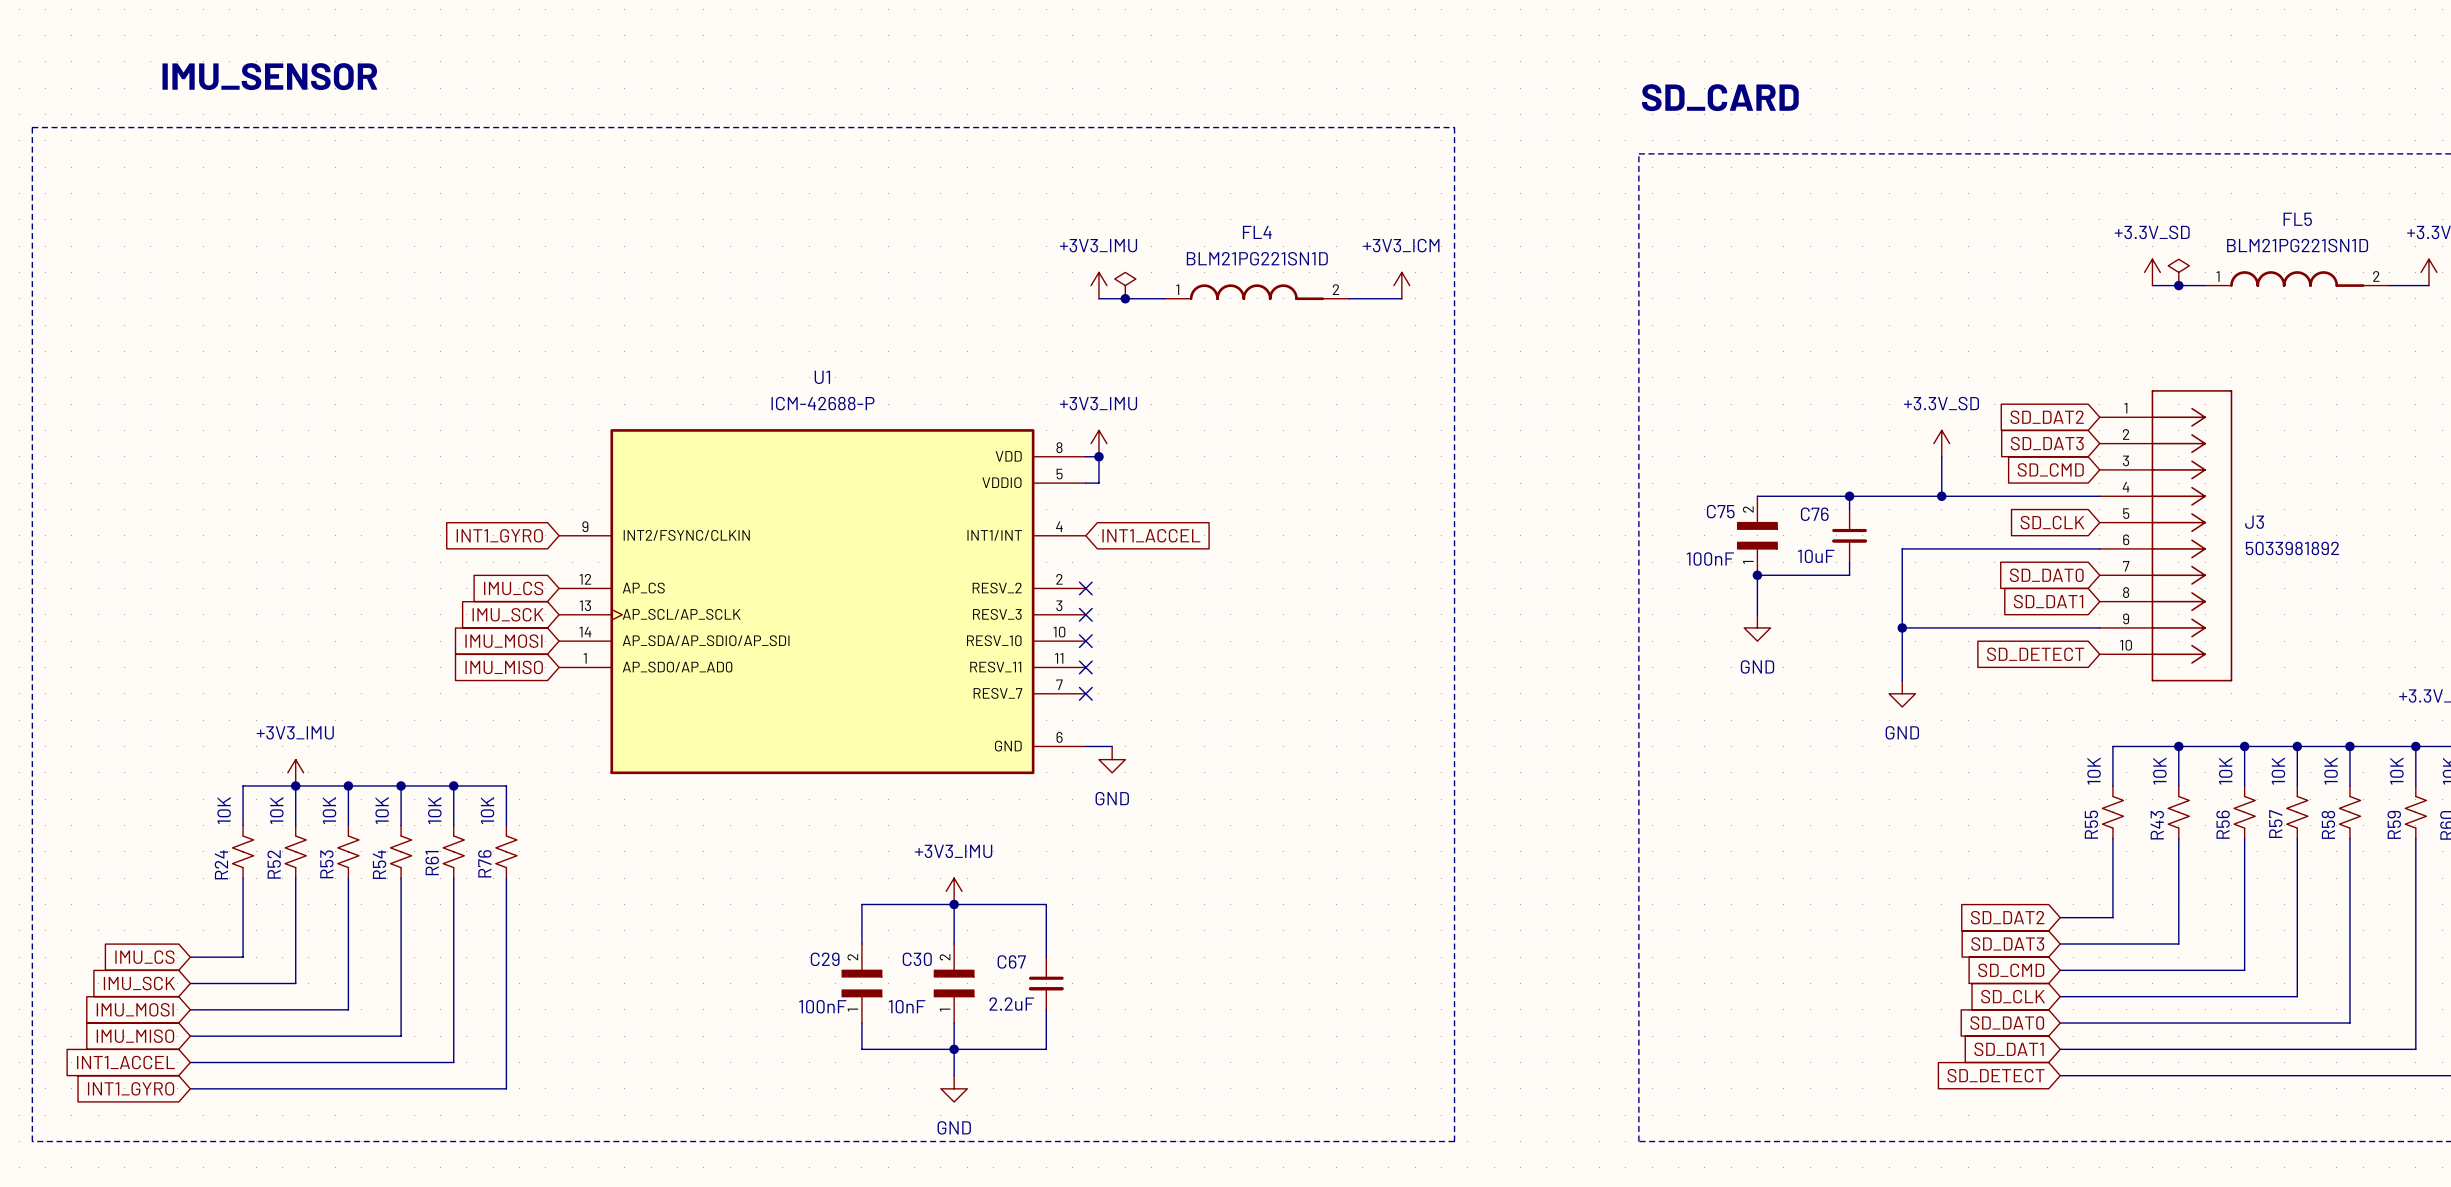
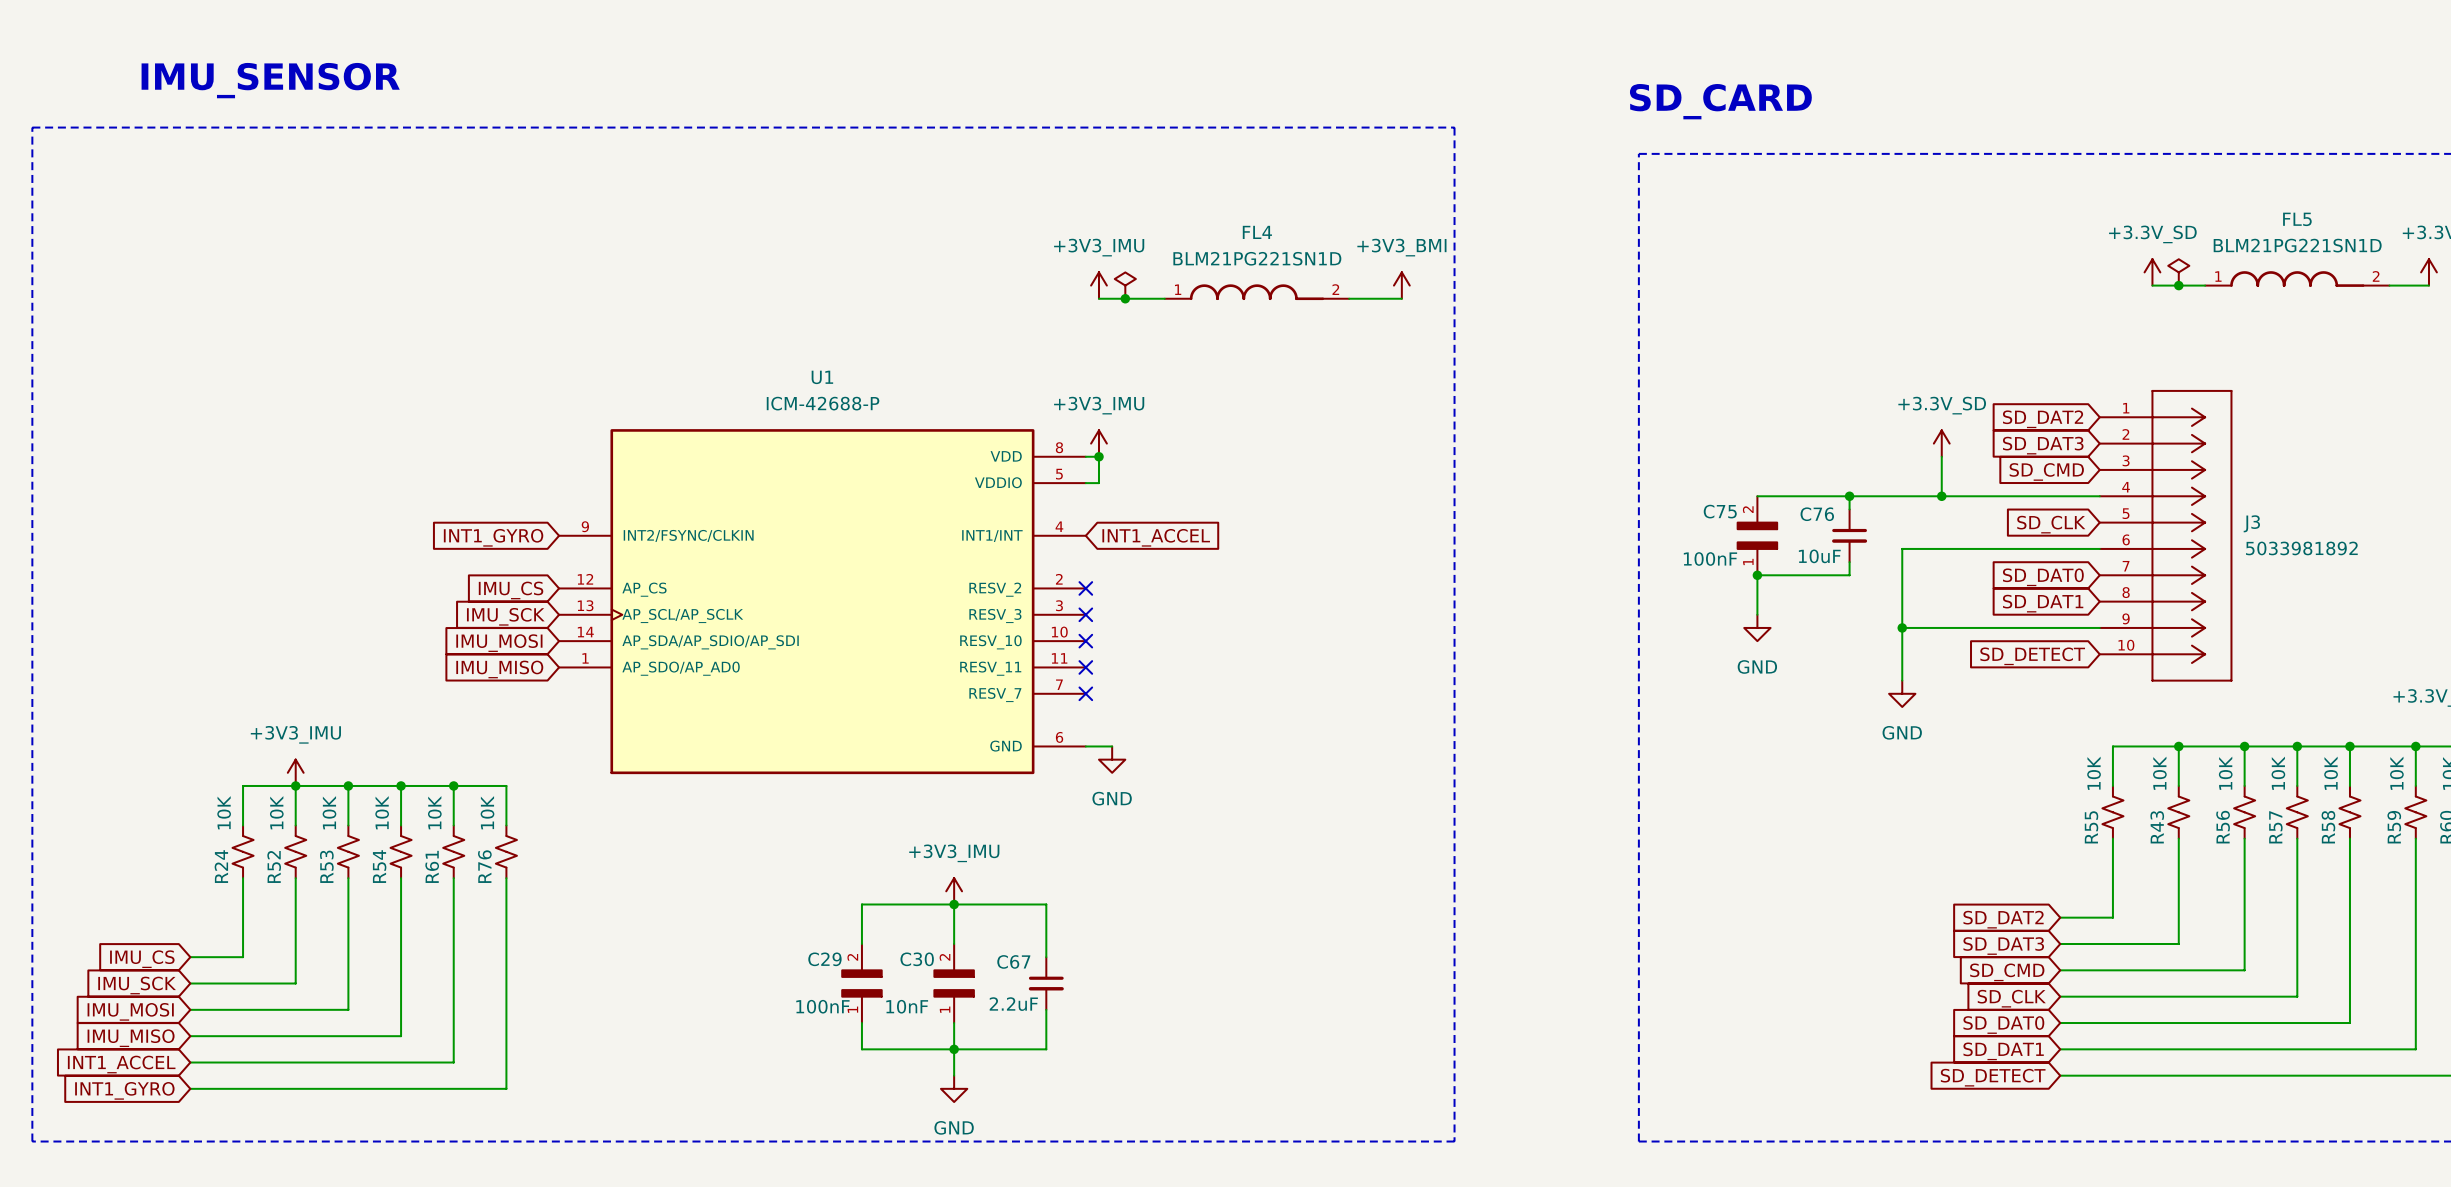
power symbol: +3V3_ICM (1401, 285) -> +3V3_BMI (1401, 285)

